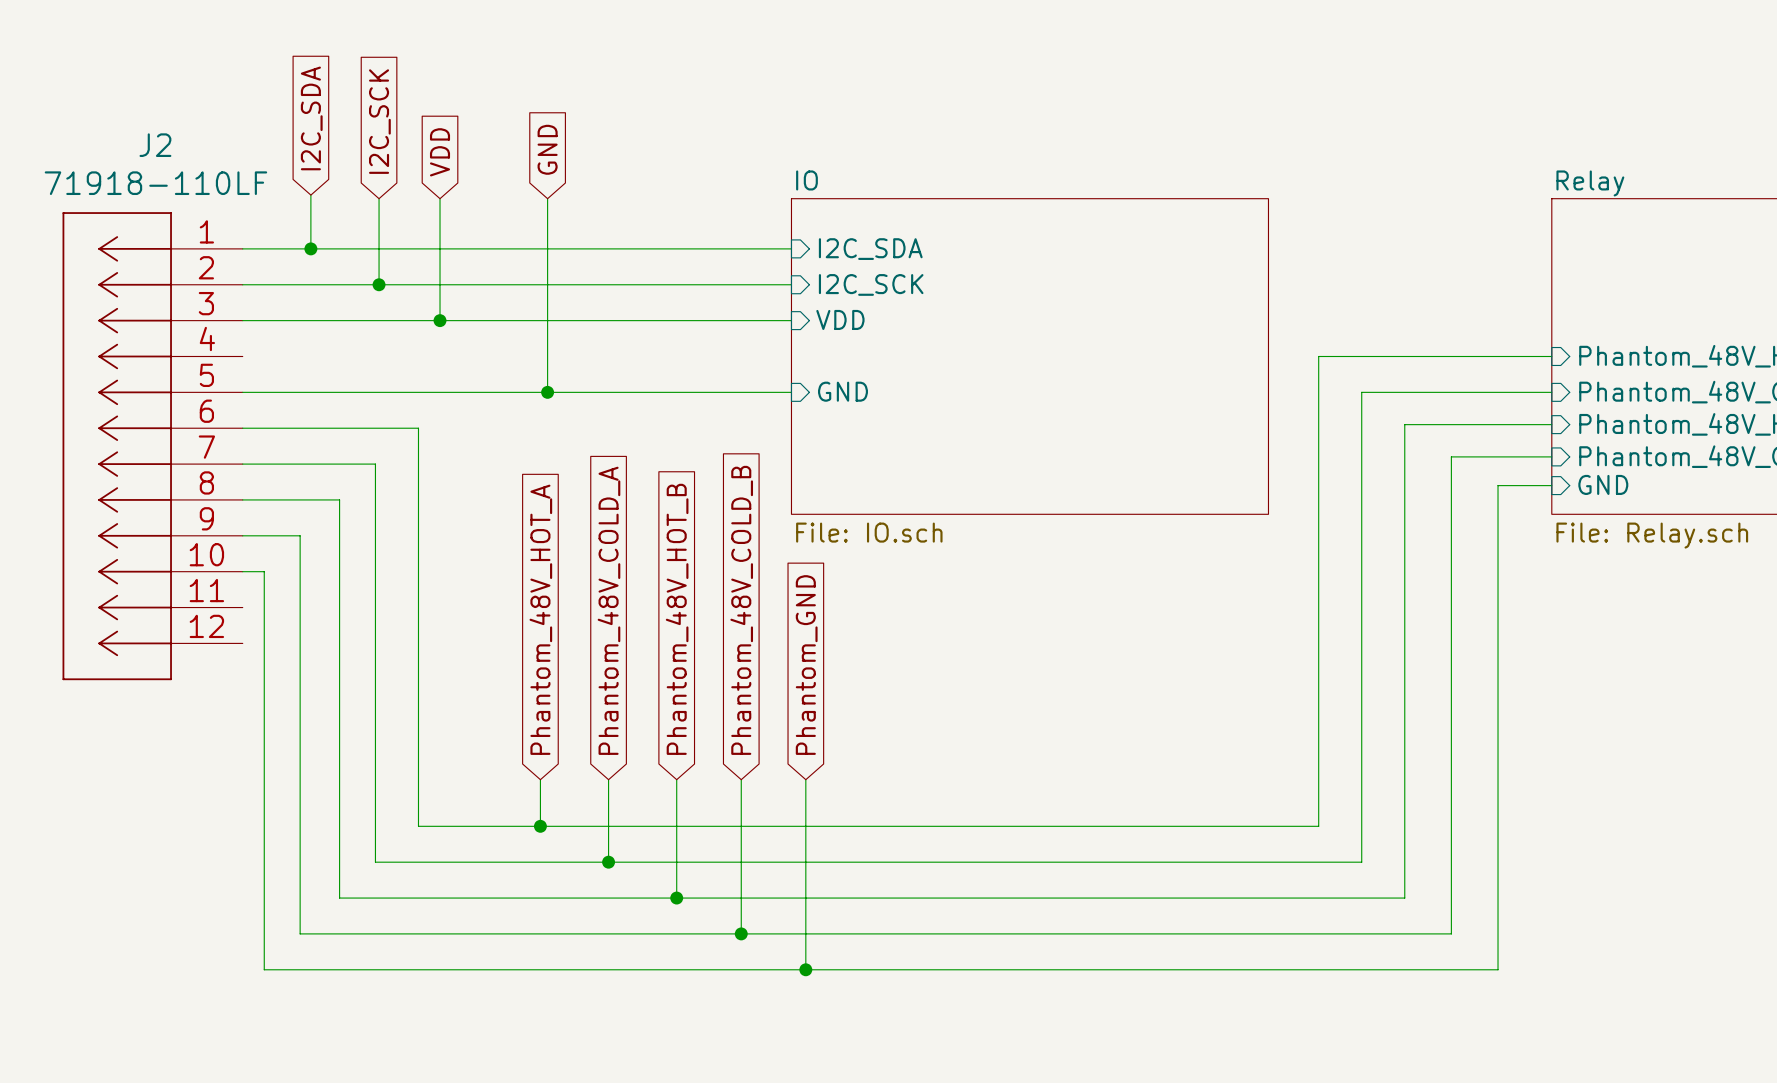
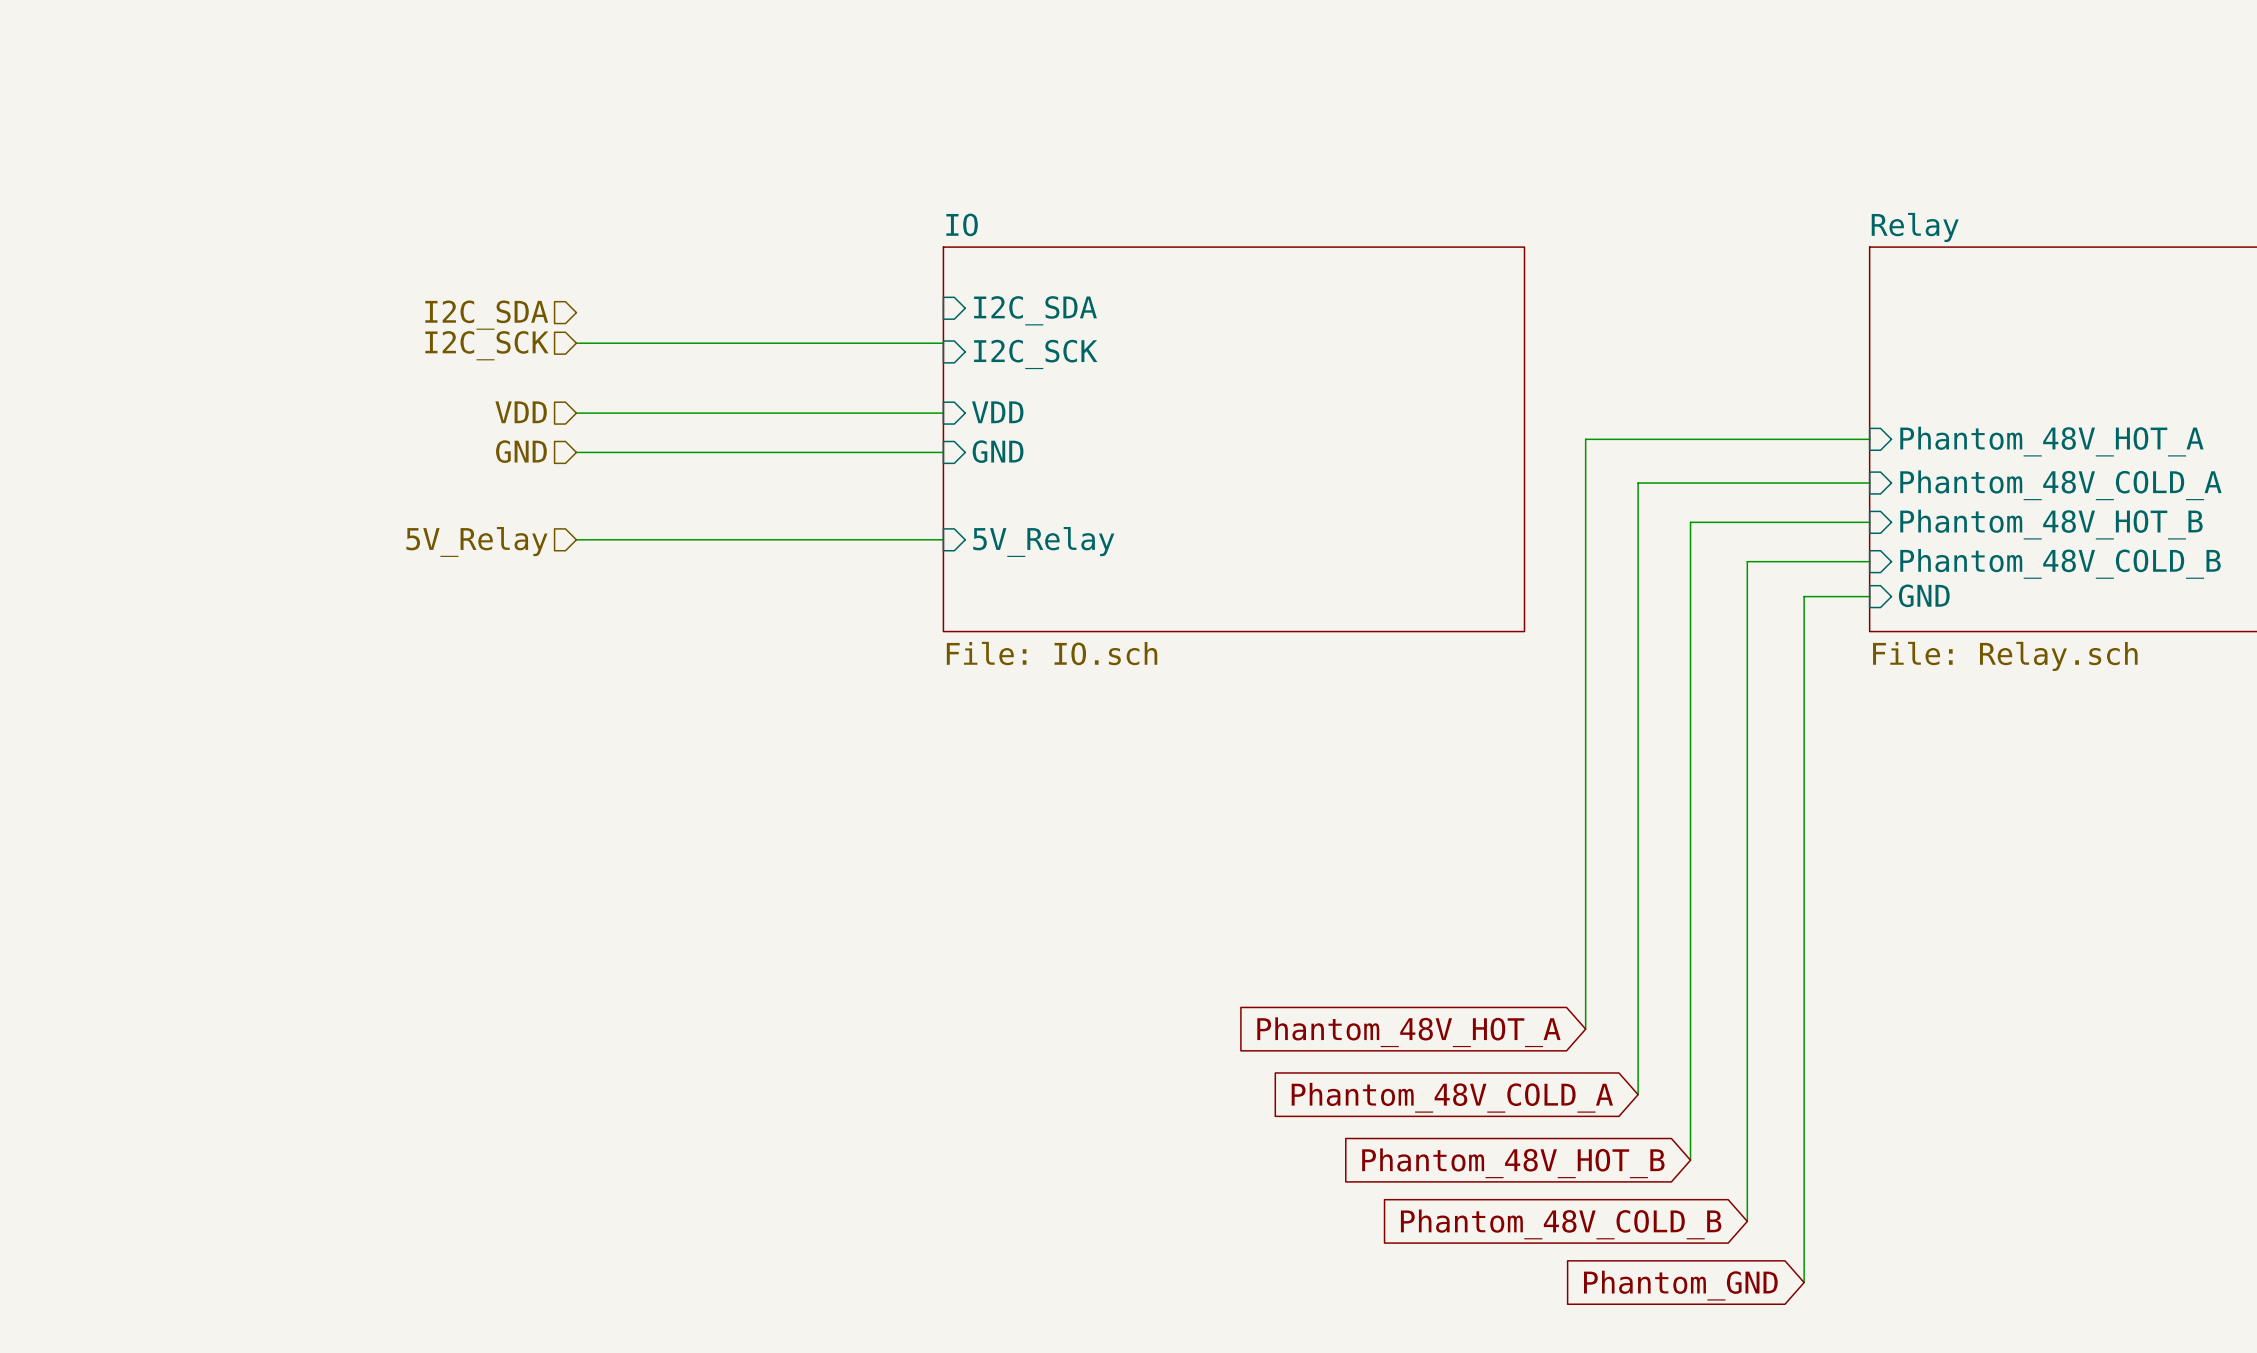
global label: I2C_SDA (311, 118) -> none
global label: I2C_SCK (379, 121) -> none
global label: GND (547, 149) -> none
global label: VDD (440, 152) -> none
wire: (310, 195) (310, 248) -> none
wire: (379, 198) (379, 284) -> none
wire: (440, 198) (440, 320) -> none
wire: (547, 198) (547, 392) -> none
wire: (242, 248) (791, 248) -> none
junction: (310, 248) -> none
hierarchical label: none -> I2C_SDA (486, 315)
hierarchical label: none -> I2C_SCK (486, 345)
wire: none -> (576, 343) (943, 343)
wire: (242, 284) (791, 284) -> none
junction: (379, 284) -> none
sheet pin position: VDD (840, 319) -> VDD (997, 412)
wire: (242, 320) (791, 320) -> none
junction: (440, 320) -> none
hierarchical label: none -> VDD (521, 412)
wire: none -> (576, 413) (943, 413)
hierarchical label: none -> GND (521, 451)
wire: none -> (576, 452) (943, 452)
sheet pin position: GND (842, 391) -> GND (998, 451)
wire: (242, 392) (791, 392) -> none
junction: (547, 392) -> none
wire: (242, 428) (418, 428) (418, 826) (1318, 826) -> (1585, 1029) (1585, 1011)
wire: none -> (576, 539) (943, 539)
hierarchical label: none -> 5V_Relay (476, 541)
sheet pin: none -> 5V_Relay (1043, 541)
J2: 71918-110LF (152, 446) -> none
wire: (242, 464) (375, 464) (375, 862) (1361, 862) -> (1638, 1094) (1638, 1055)
wire: (242, 499) (339, 499) (339, 898) (1404, 898) -> (1690, 1160) (1690, 1099)
wire: (242, 535) (300, 535) (300, 933) (1451, 933) -> (1747, 1221) (1747, 1142)
wire: (242, 571) (264, 571) (264, 969) (1498, 969) -> (1804, 1282) (1804, 1186)
global label: Phantom_48V_COLD_A (608, 610) -> none
global label: Phantom_48V_COLD_B (741, 610) -> none
global label: Phantom_48V_HOT_A (540, 619) -> none
global label: Phantom_48V_HOT_B (677, 619) -> none
global label: Phantom_GND (806, 665) -> none
wire: (540, 779) (540, 826) -> none
wire: (608, 779) (608, 862) -> none
wire: (676, 779) (676, 898) -> none
wire: (741, 779) (741, 933) -> none
wire: (805, 779) (805, 969) -> none
junction: (540, 826) -> none
global label: none -> Phantom_48V_HOT_A (1408, 1032)
junction: (608, 862) -> none
global label: none -> Phantom_48V_COLD_A (1452, 1097)
junction: (676, 898) -> none
junction: (741, 933) -> none
global label: none -> Phantom_48V_HOT_B (1513, 1163)
junction: (805, 969) -> none
global label: none -> Phantom_48V_COLD_B (1561, 1224)
global label: none -> Phantom_GND (1680, 1285)

